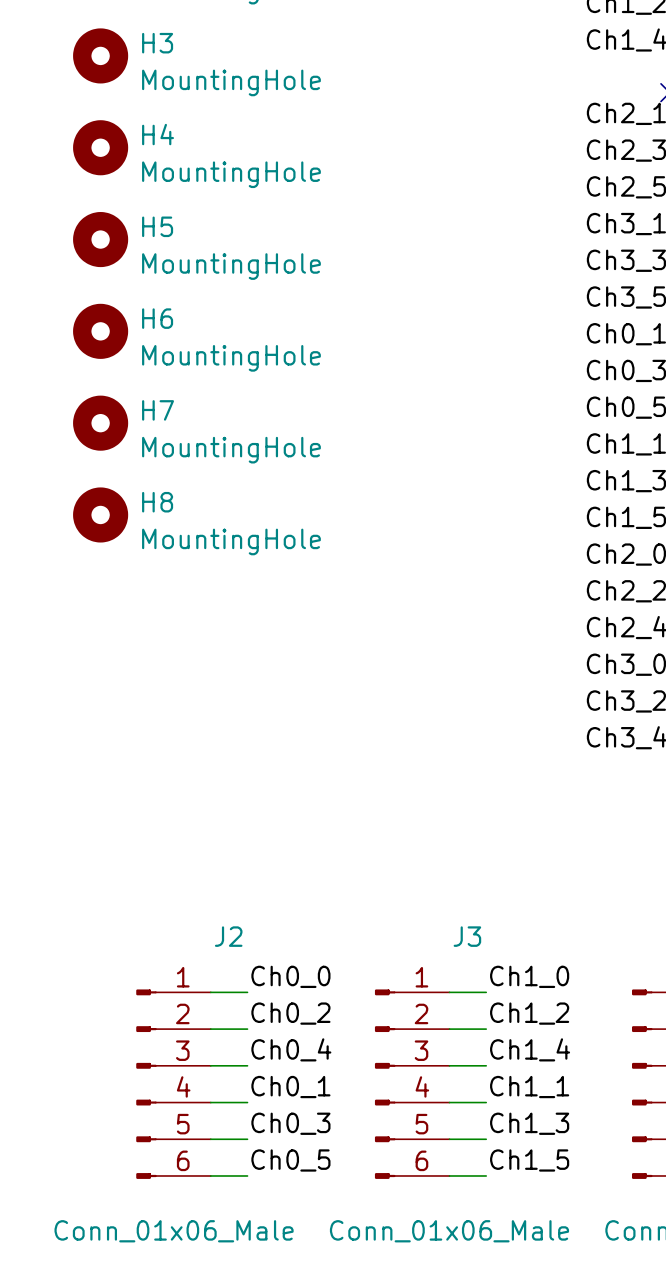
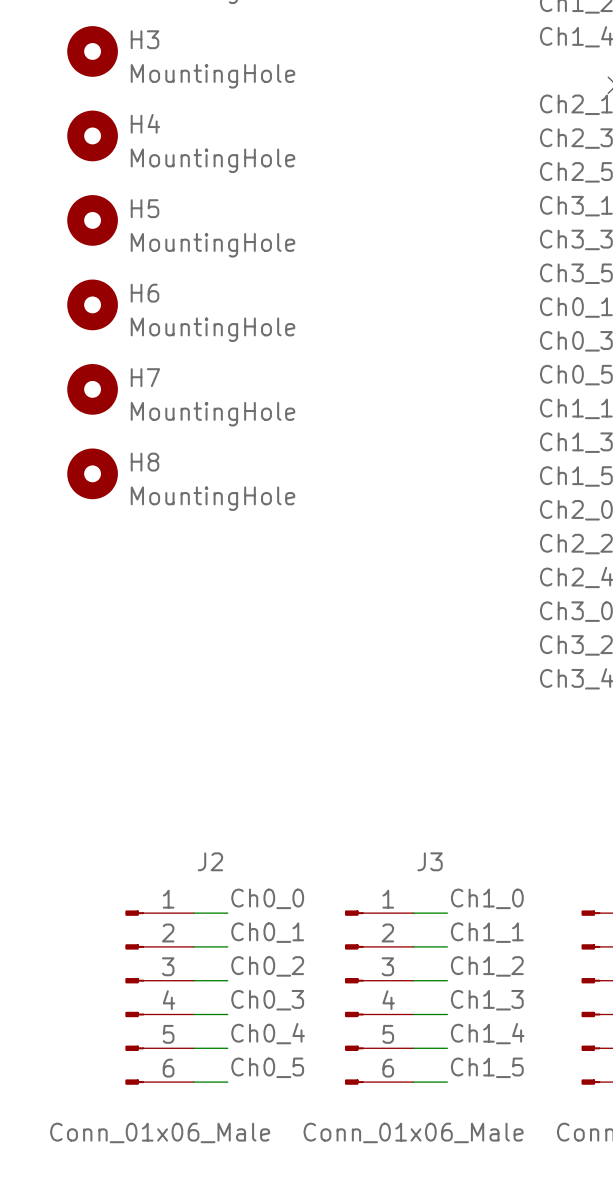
label: Ch0_2 (290, 1013) -> Ch0_1 (267, 932)
label: Ch1_2 (529, 1013) -> Ch1_1 (487, 932)
label: Ch0_4 (291, 1049) -> Ch0_2 (267, 966)
label: Ch1_4 (530, 1049) -> Ch1_2 (487, 966)
label: Ch0_1 (290, 1087) -> Ch0_3 (267, 1000)
label: Ch1_1 (529, 1087) -> Ch1_3 (487, 1000)
label: Ch0_3 (290, 1123) -> Ch0_4 (268, 1033)
label: Ch1_3 (529, 1123) -> Ch1_4 (487, 1033)

